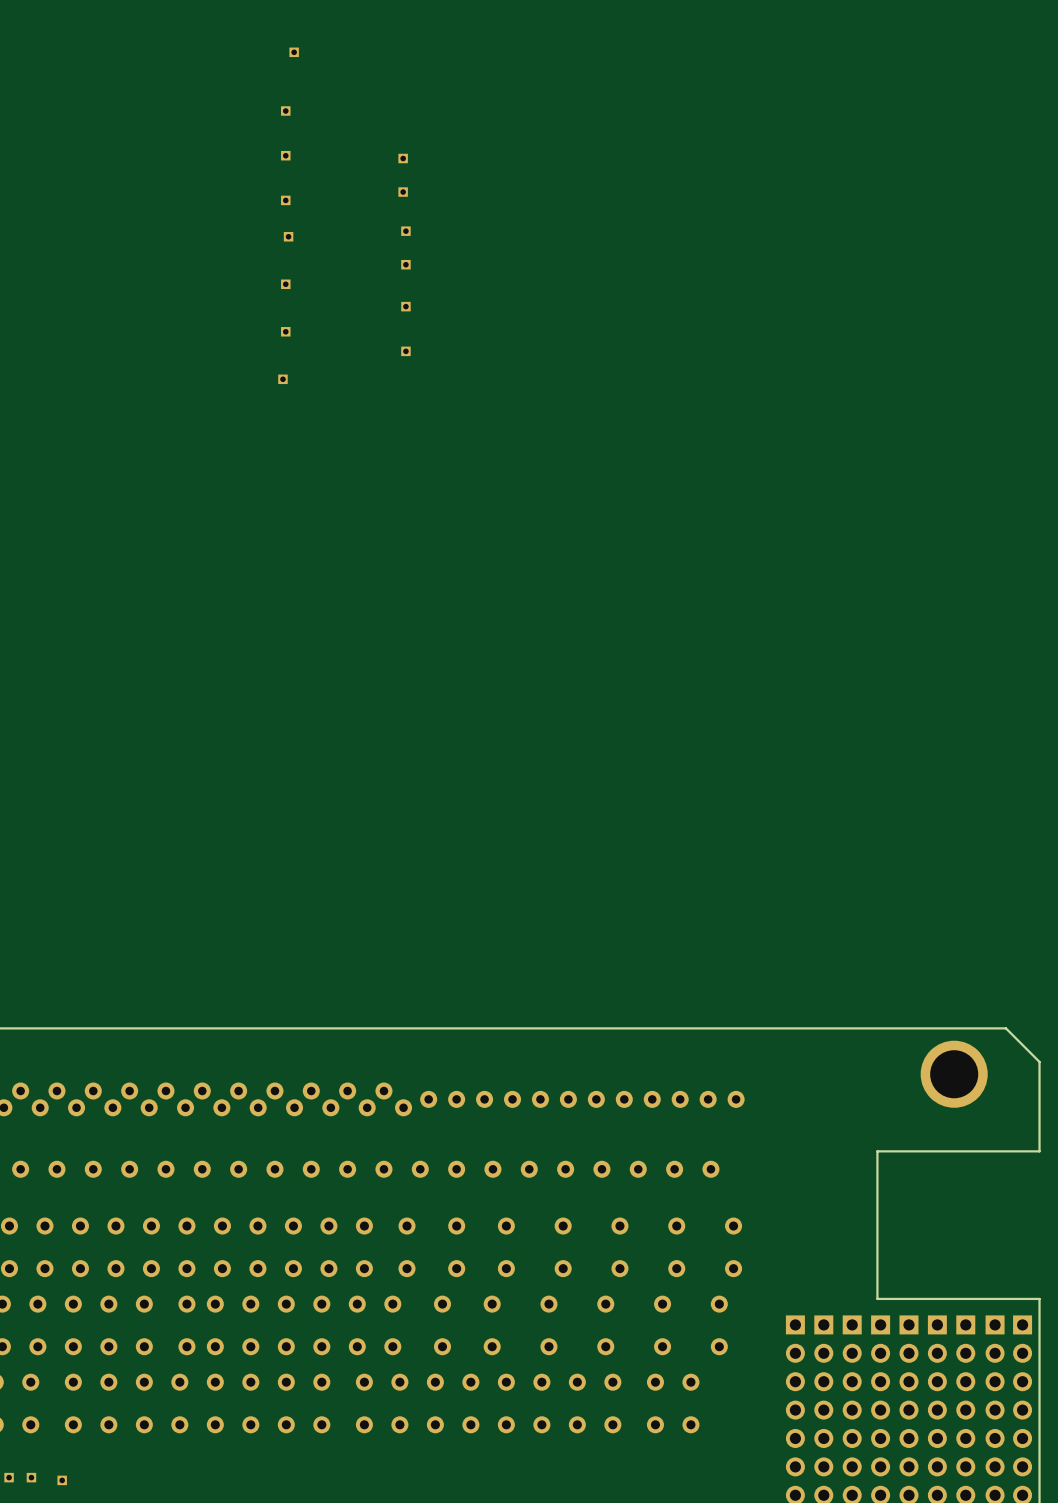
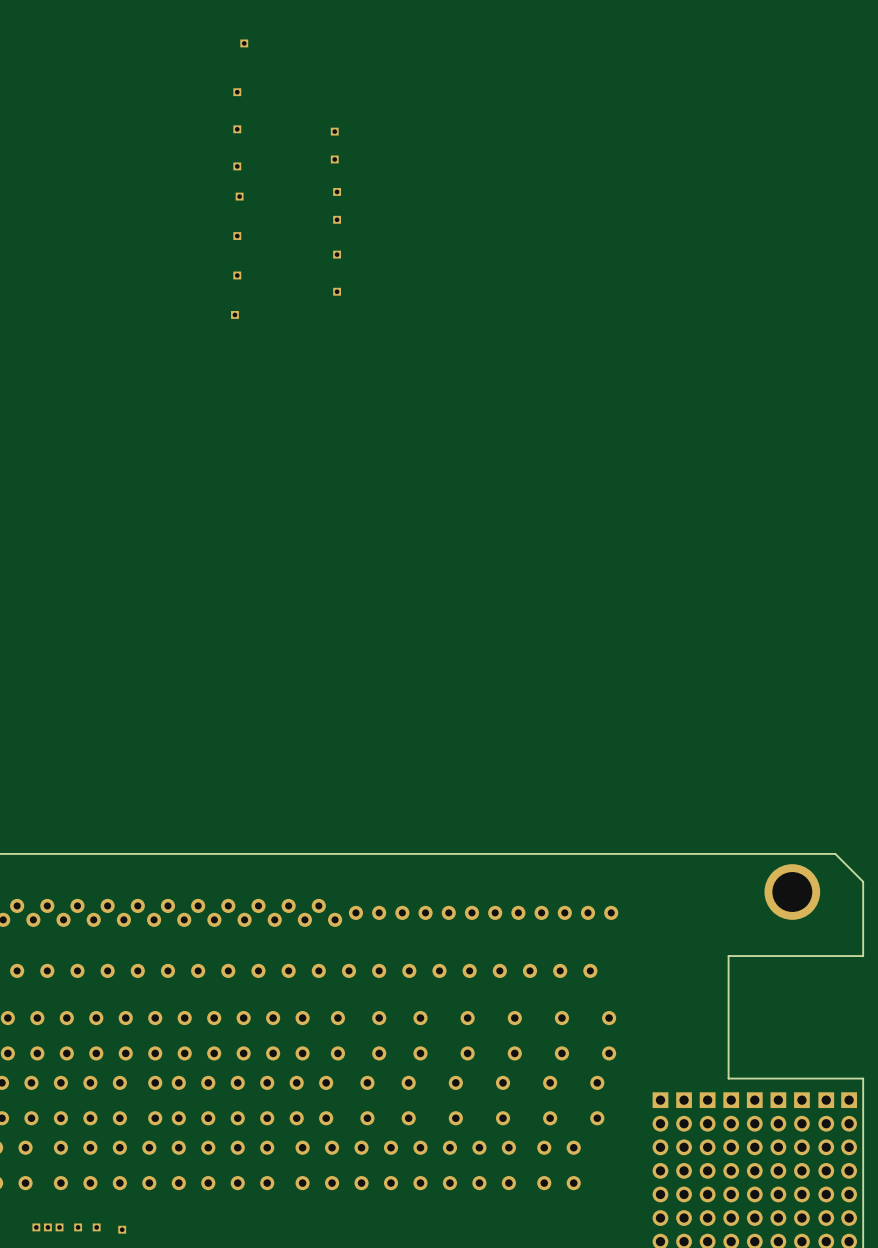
part: (9, 1477) -> none
part: (31, 1477) -> none
part: none -> (36, 1227)
part: none -> (47, 1227)
part: none -> (59, 1227)
part: none -> (78, 1227)
part: none -> (96, 1227)
part: (62, 1480) -> none
part: none -> (122, 1229)

